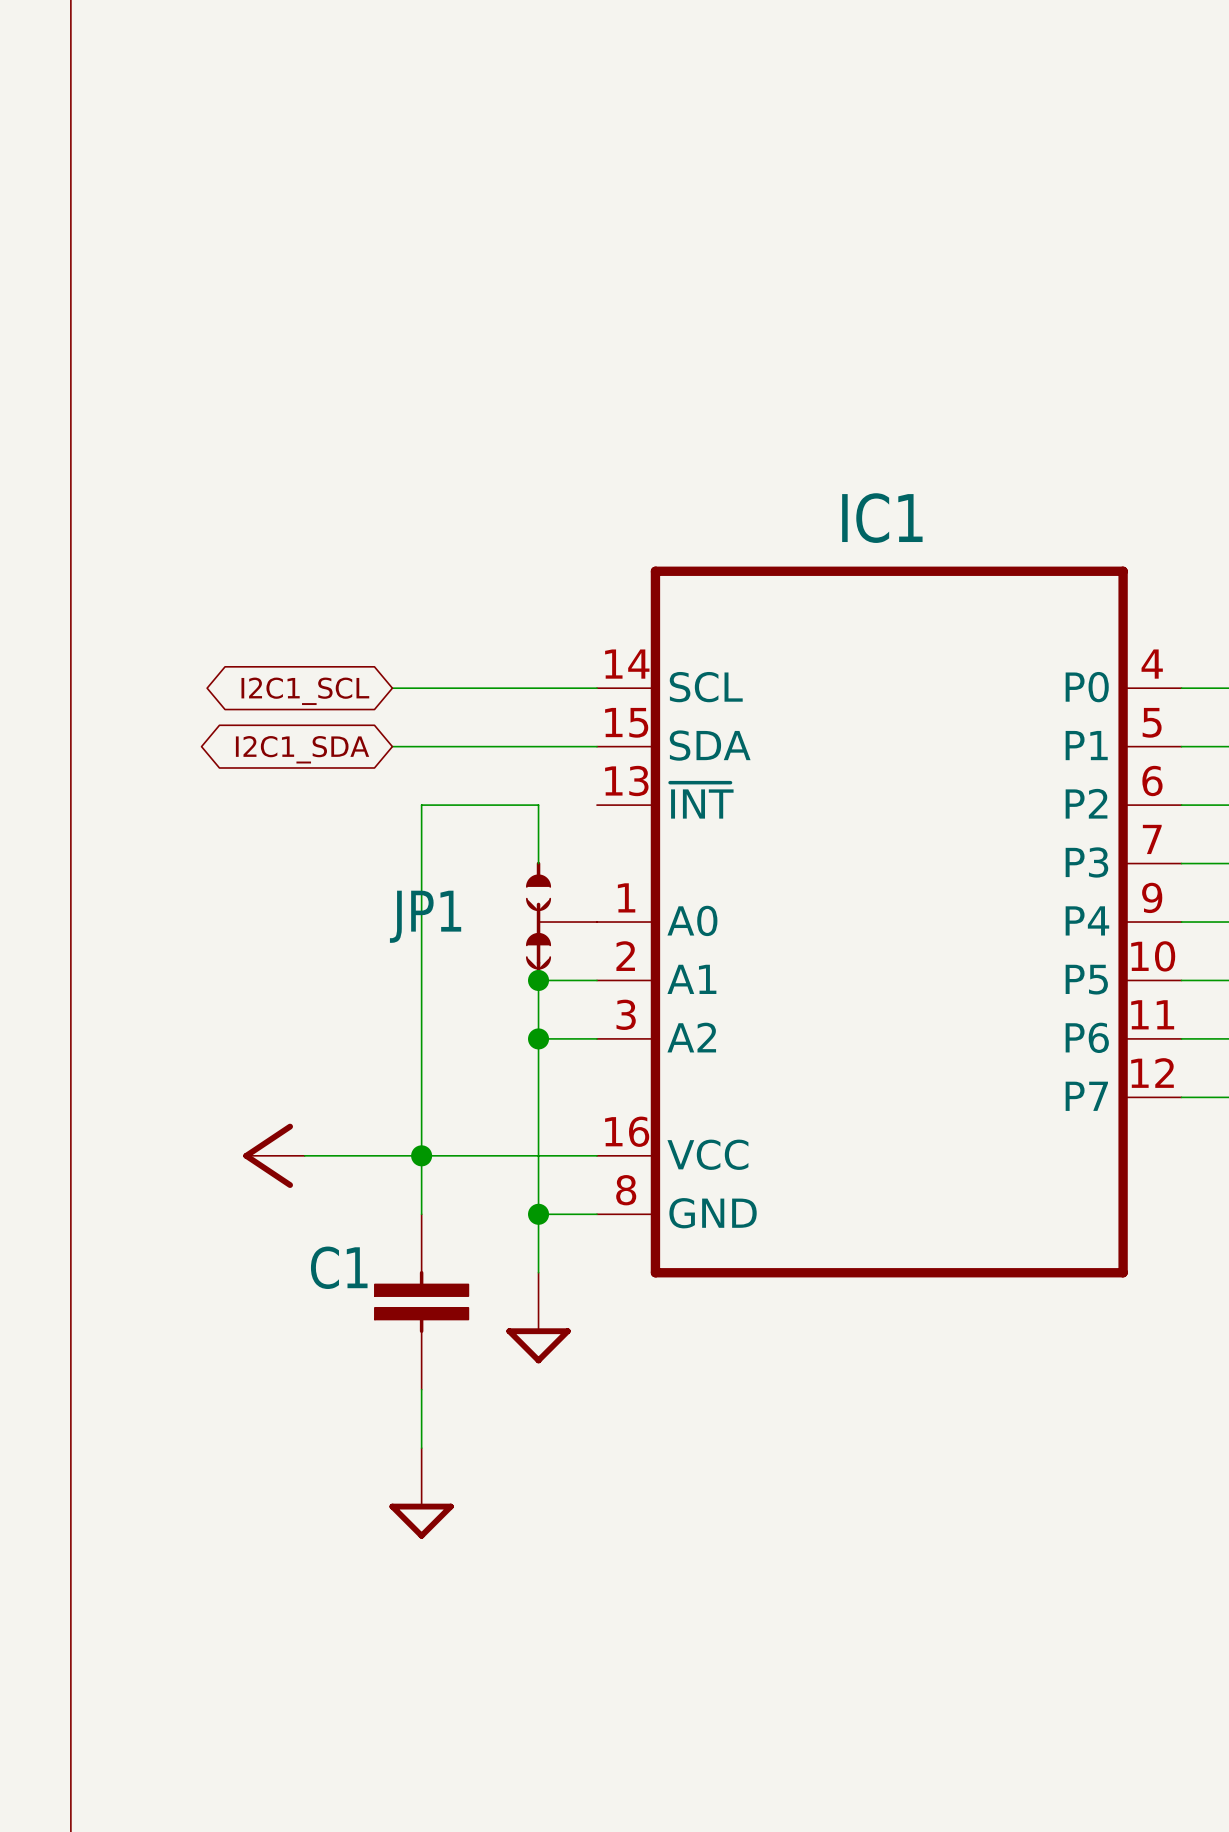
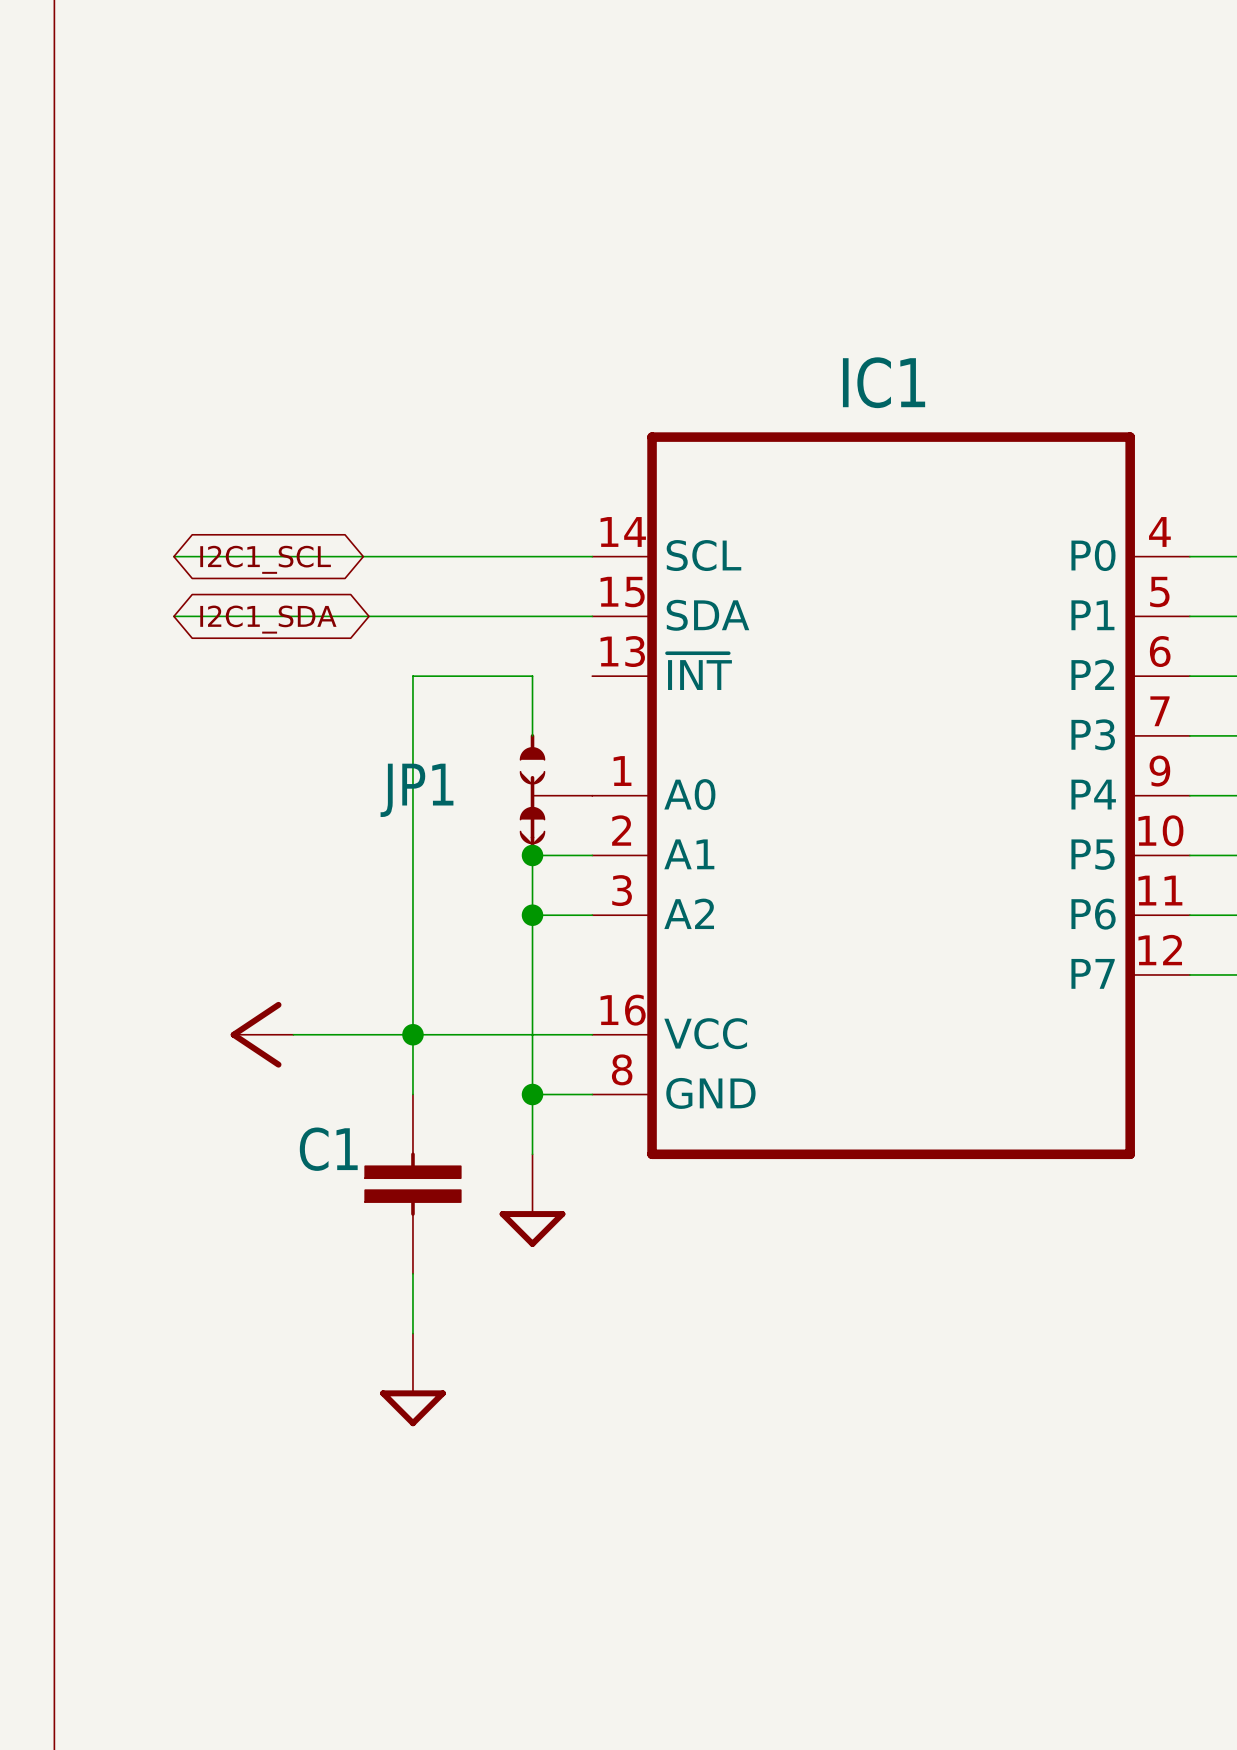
wire: none -> (173, 556) (383, 556)
global label rotation: 0° (305, 691) -> 180° (265, 559)
wire: none -> (173, 616) (383, 616)
global label rotation: 0° (302, 749) -> 180° (268, 619)

